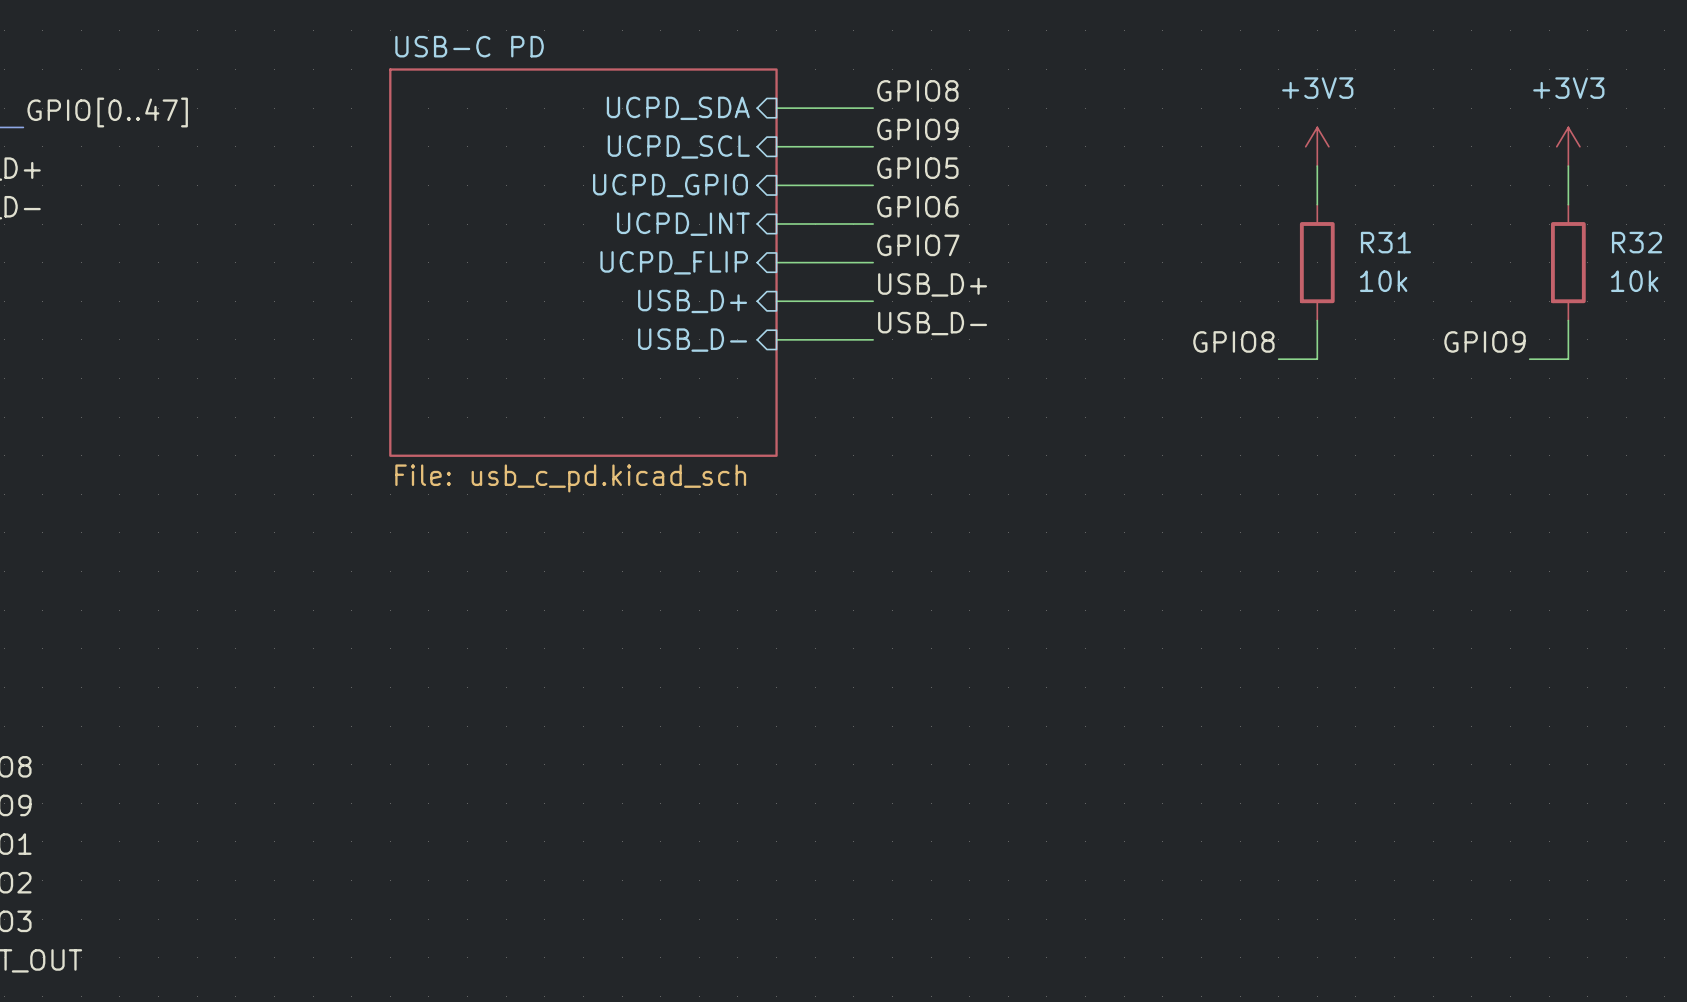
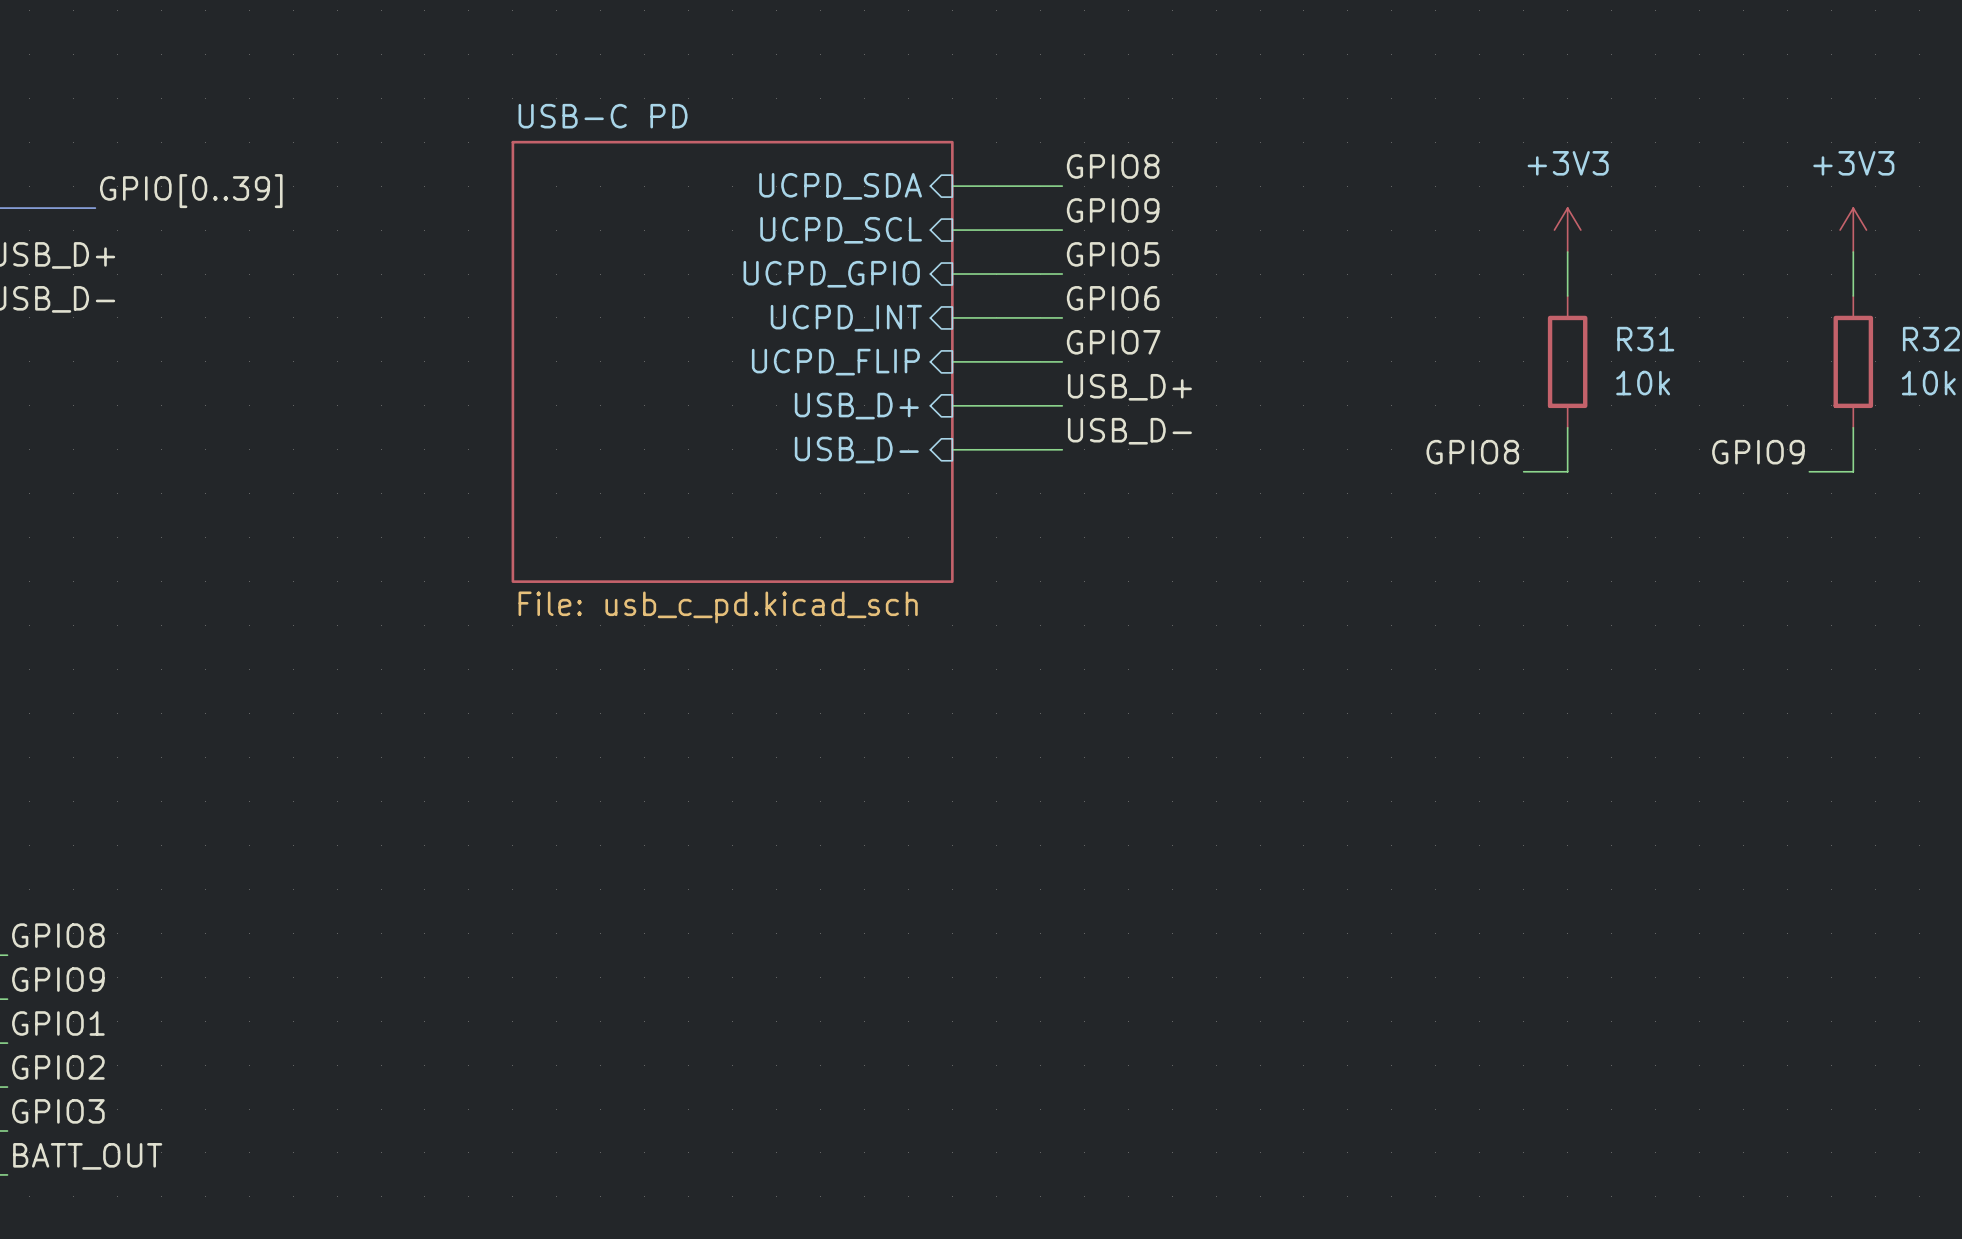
label: GPIO[0..47] (107, 112) -> GPIO[0..39] (191, 191)

